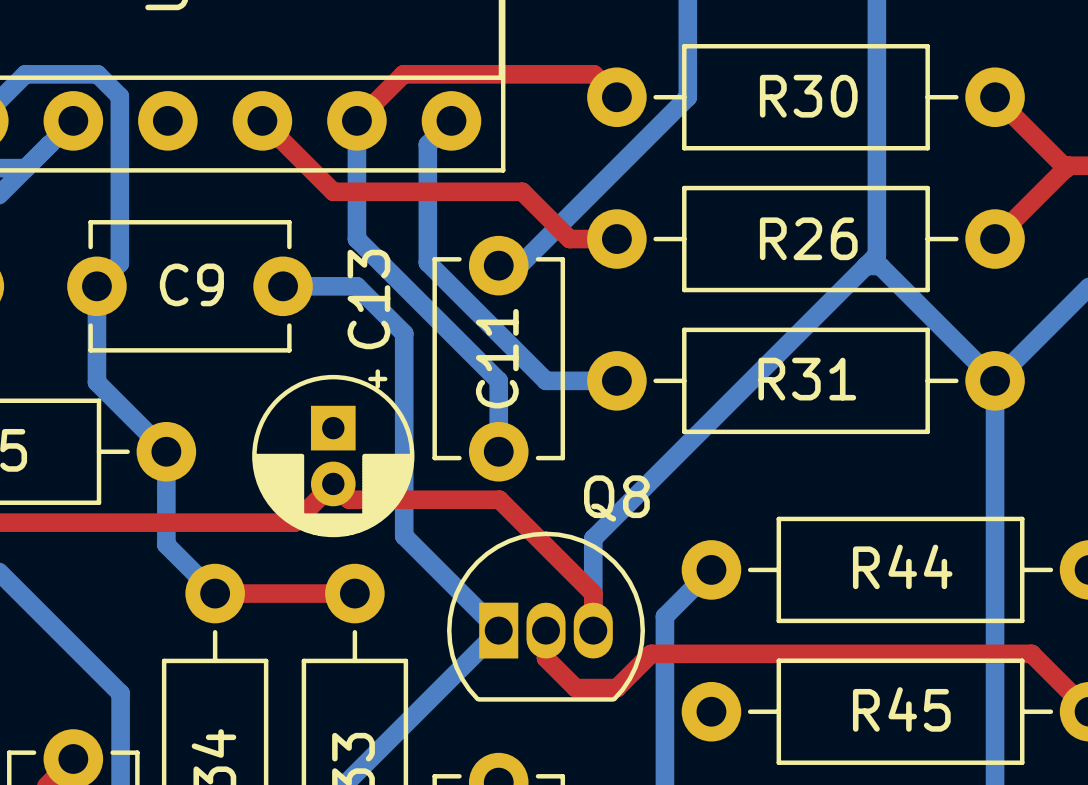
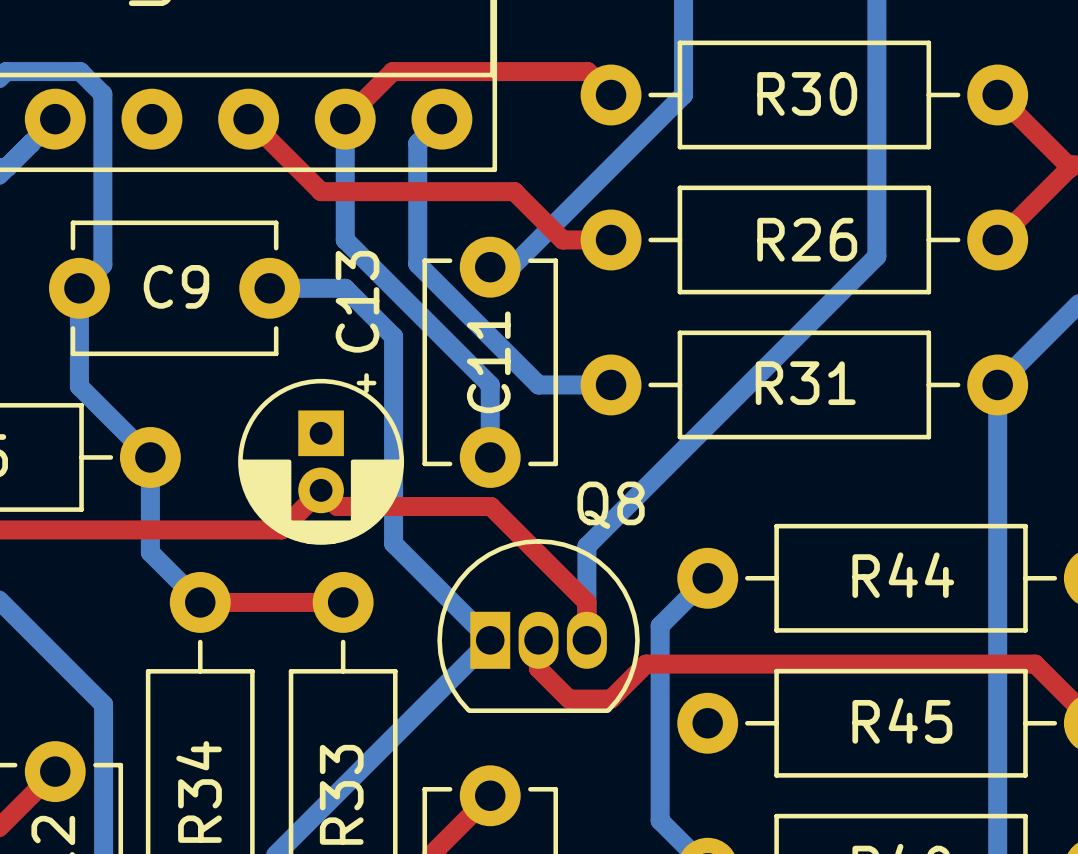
bottom track: (866, 265) (880, 265) (995, 380) -> none

